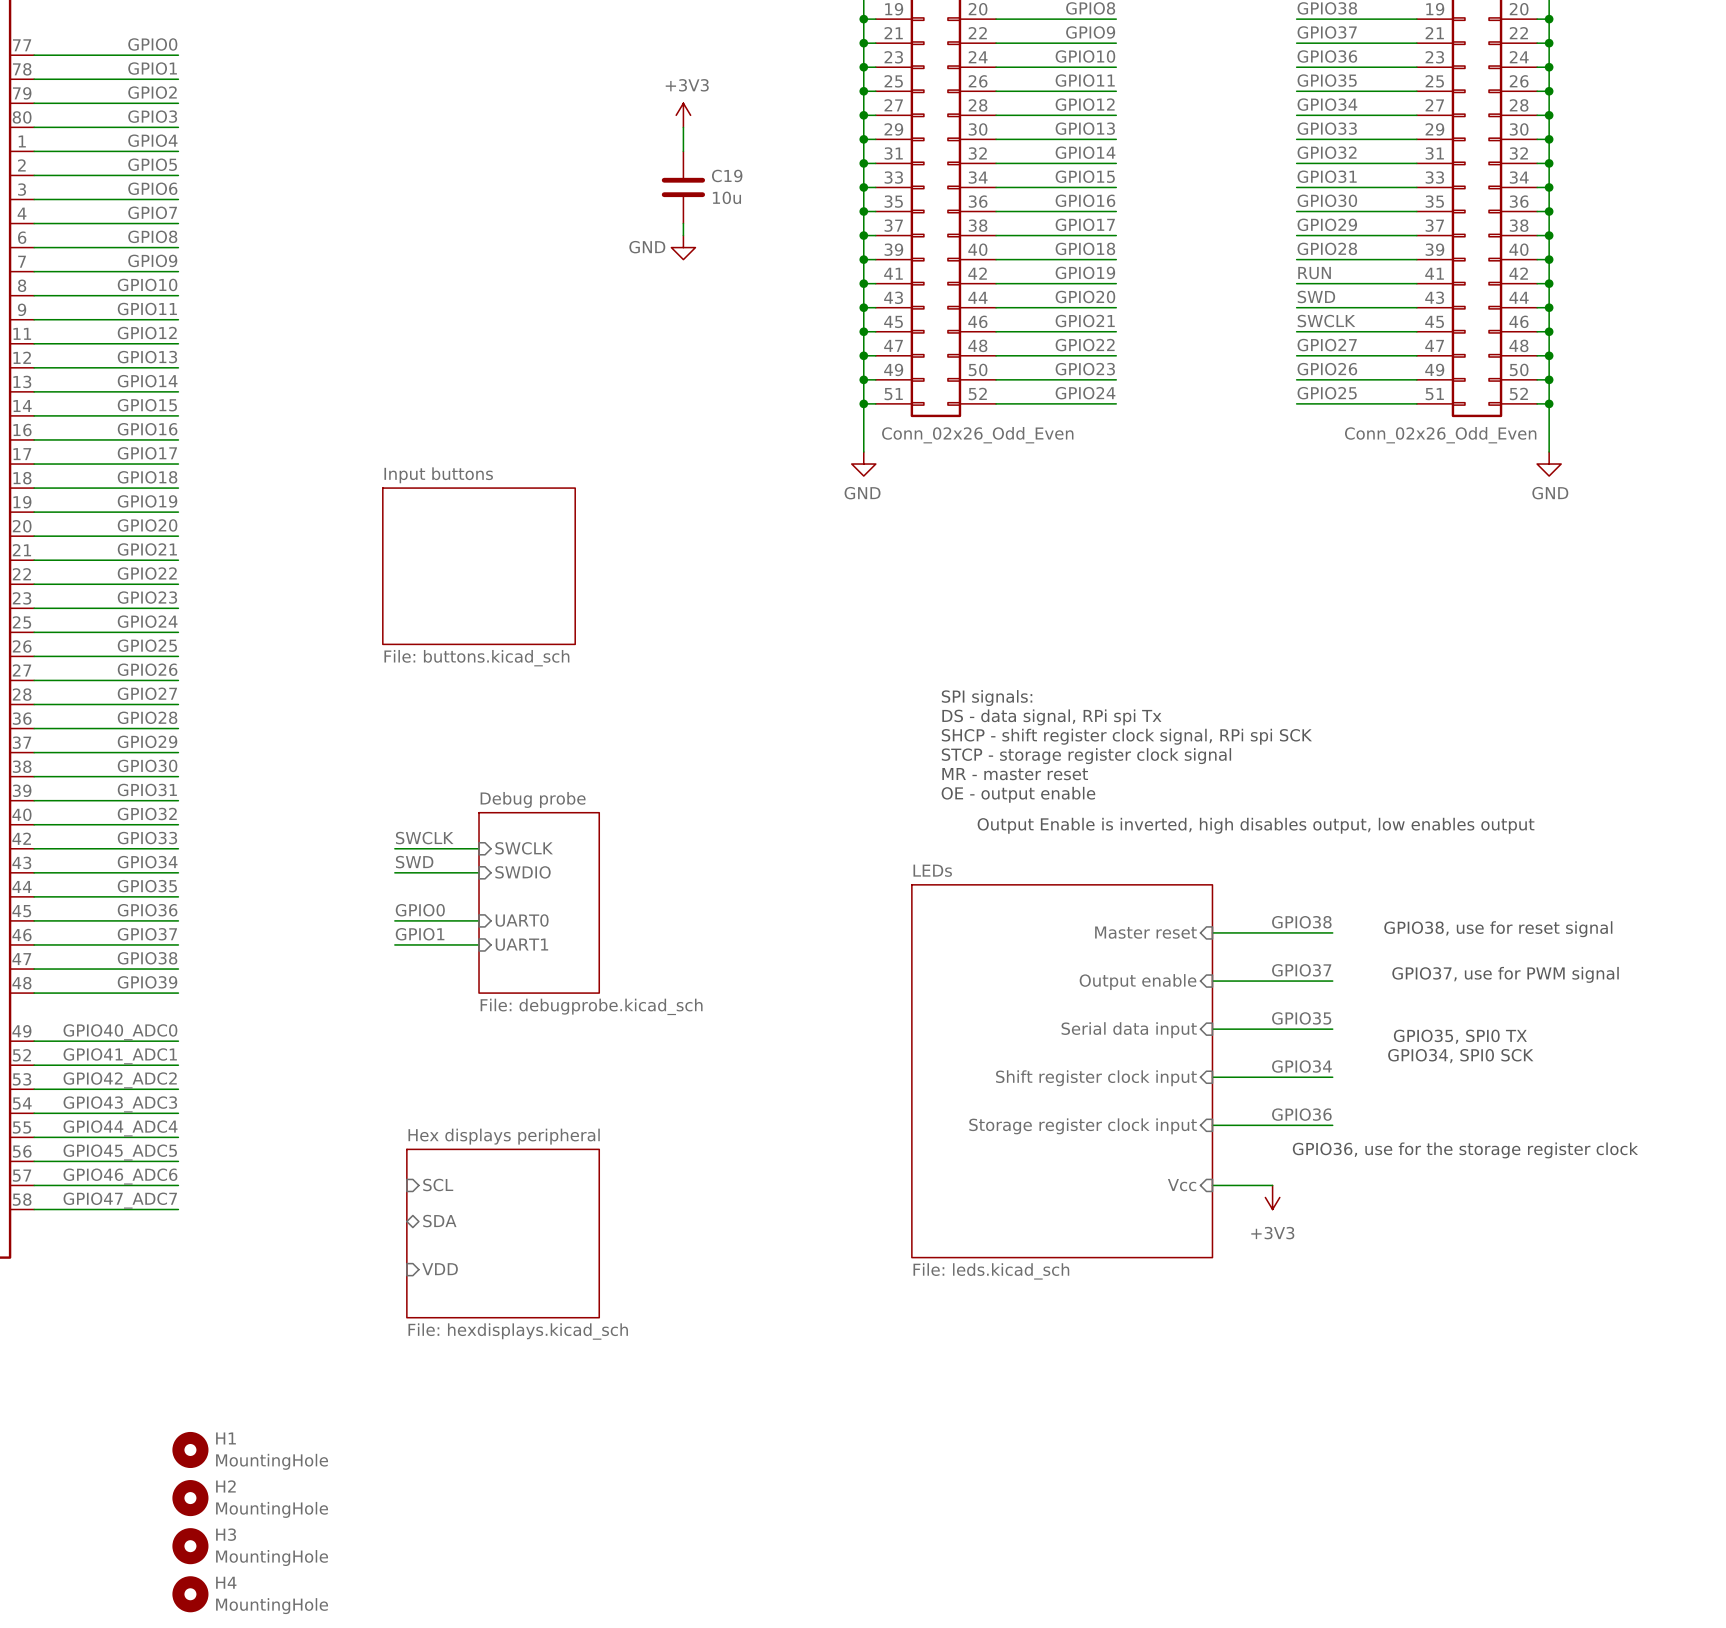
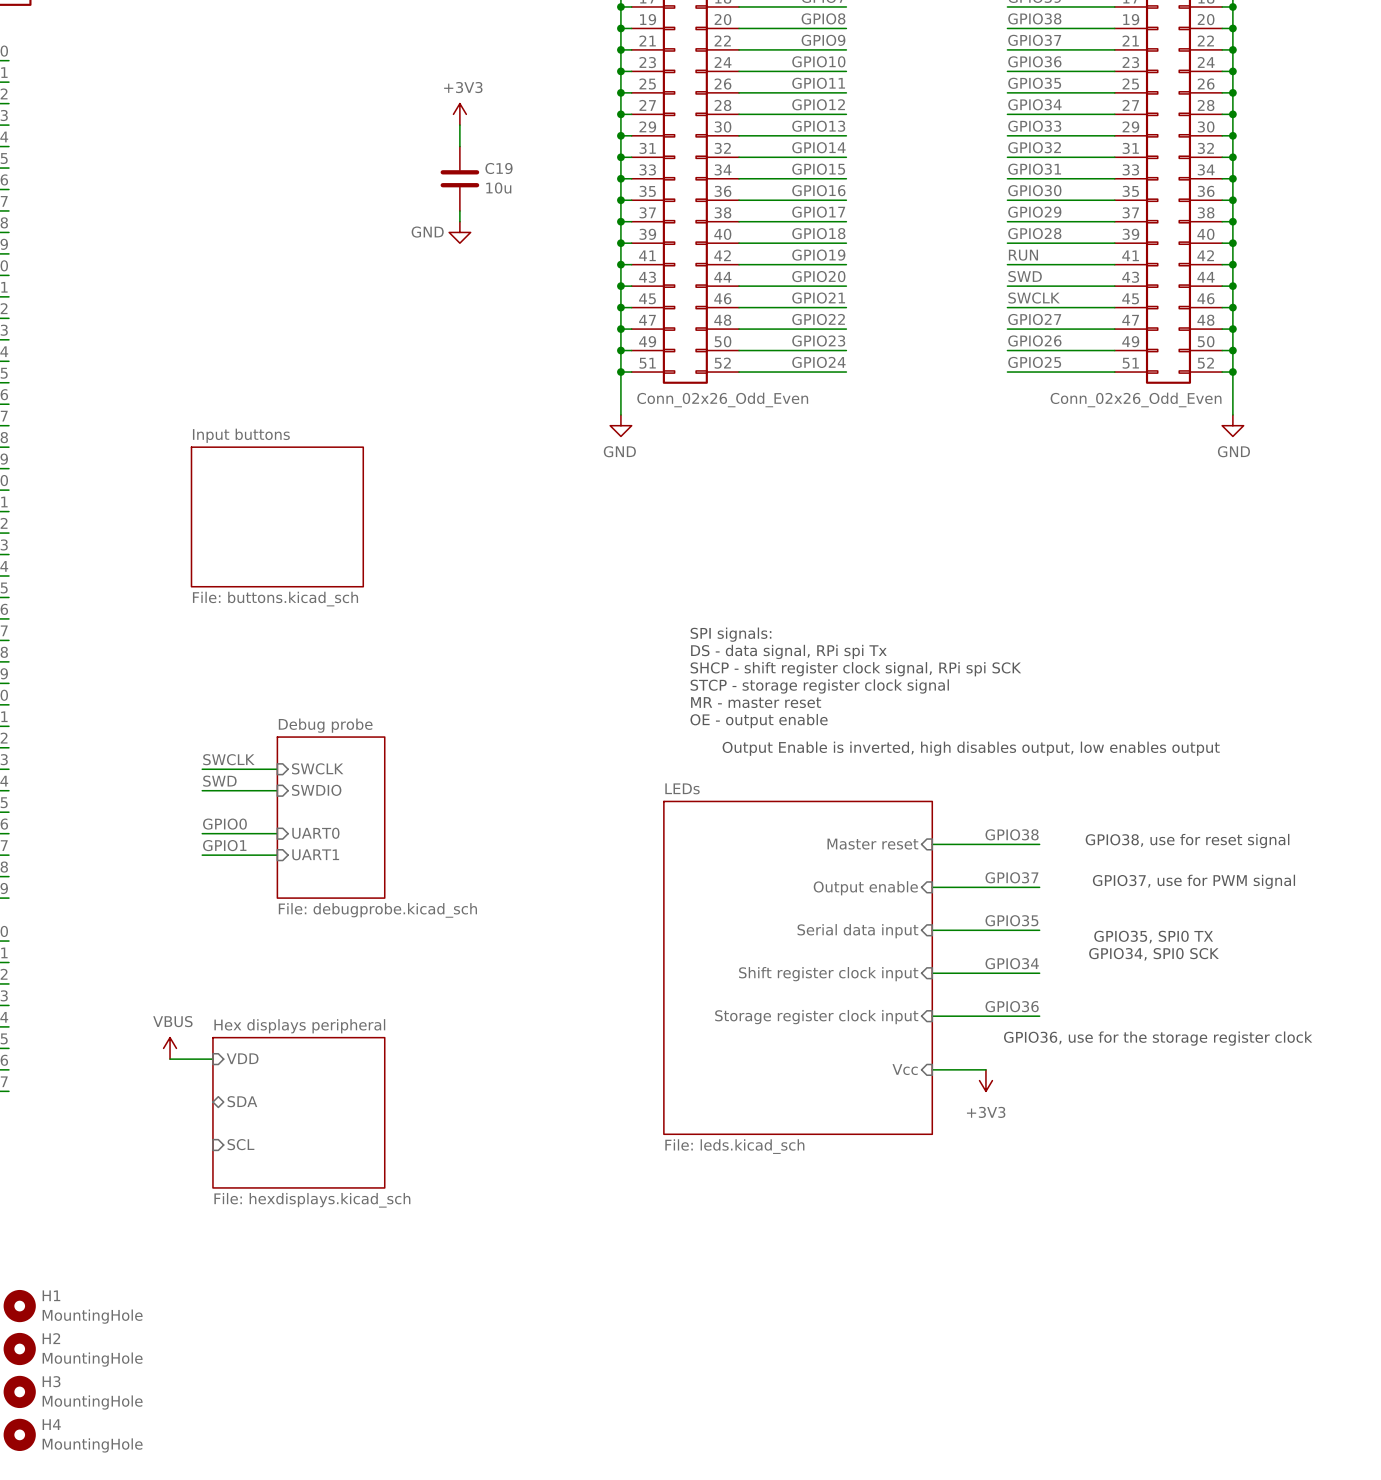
power symbol: none -> VBUS (170, 1048)
sheet pin: none -> VDD (242, 1058)
wire: none -> (170, 1059) (212, 1059)
sheet pin: SCL (438, 1185) -> none
sheet pin: VDD (440, 1269) -> SCL (240, 1144)

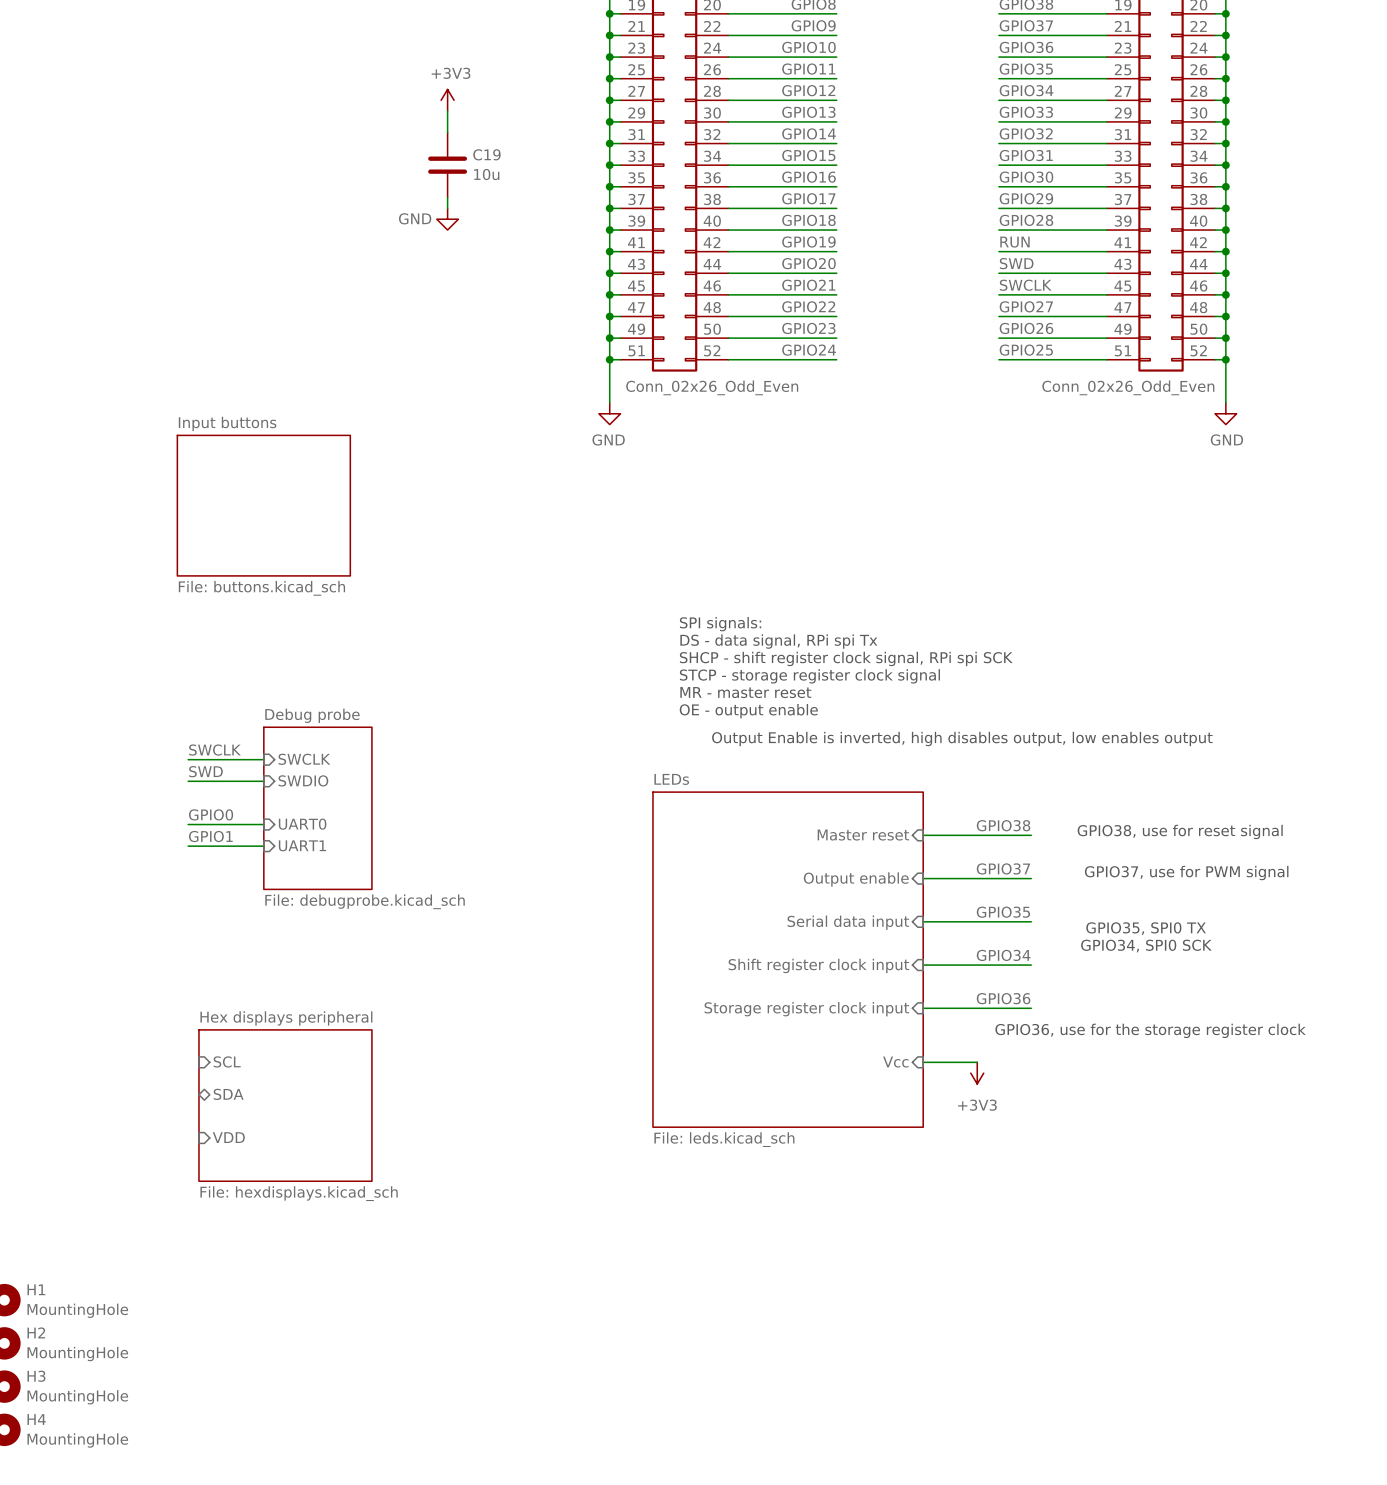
power symbol: VBUS (170, 1048) -> none
sheet pin: VDD (242, 1058) -> none
wire: (170, 1059) (212, 1059) -> none
sheet pin: none -> SCL (227, 1061)
sheet pin: SCL (240, 1144) -> VDD (228, 1137)

